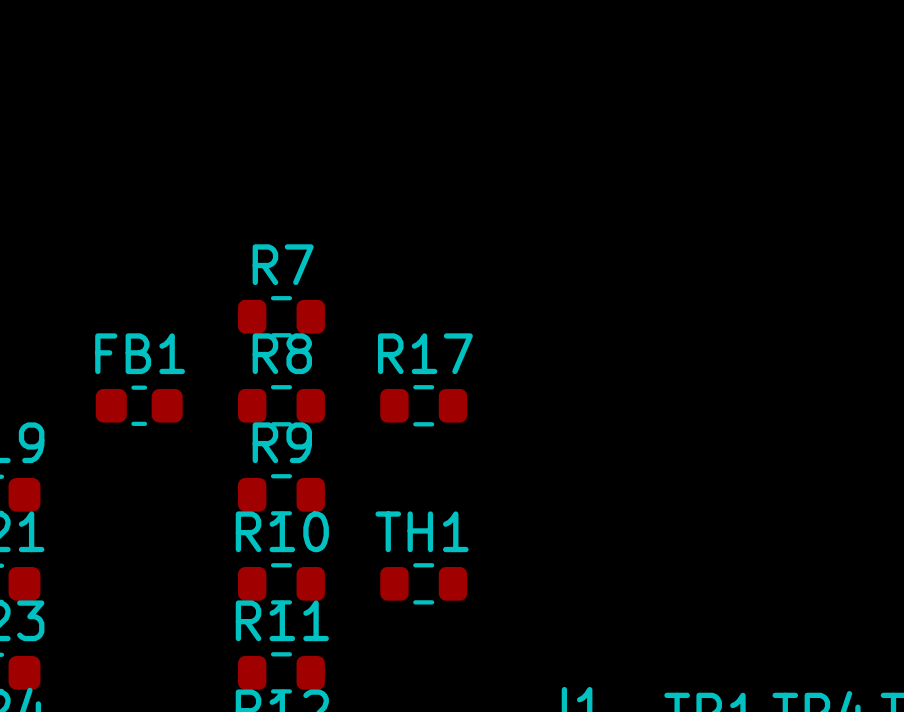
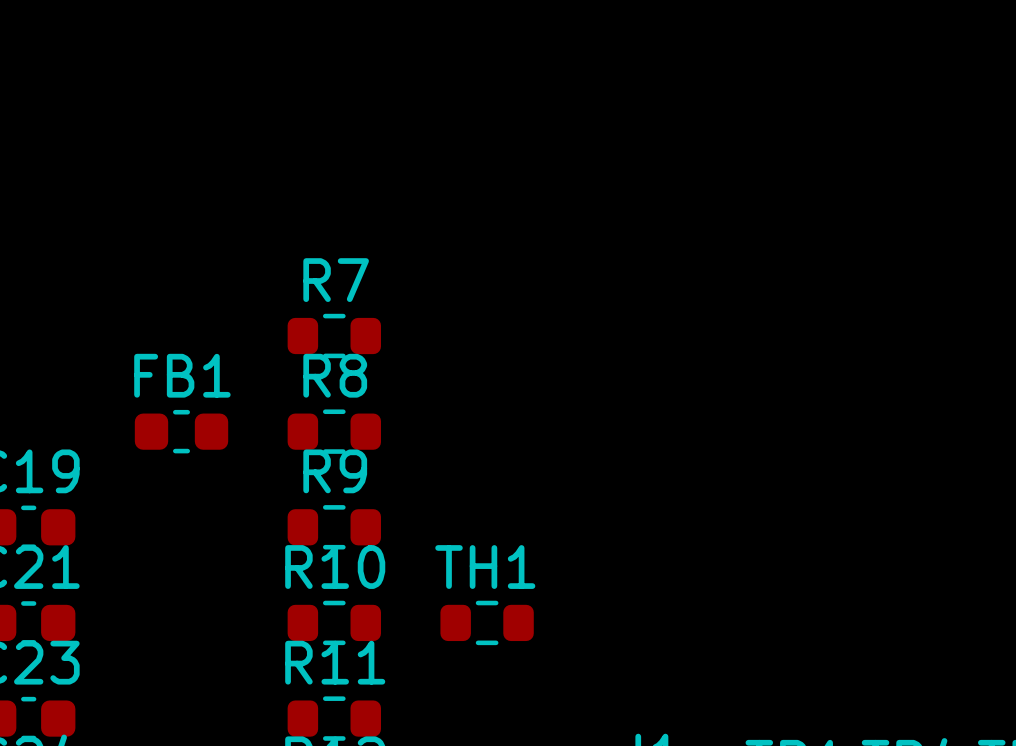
R17: (423, 405) -> none

